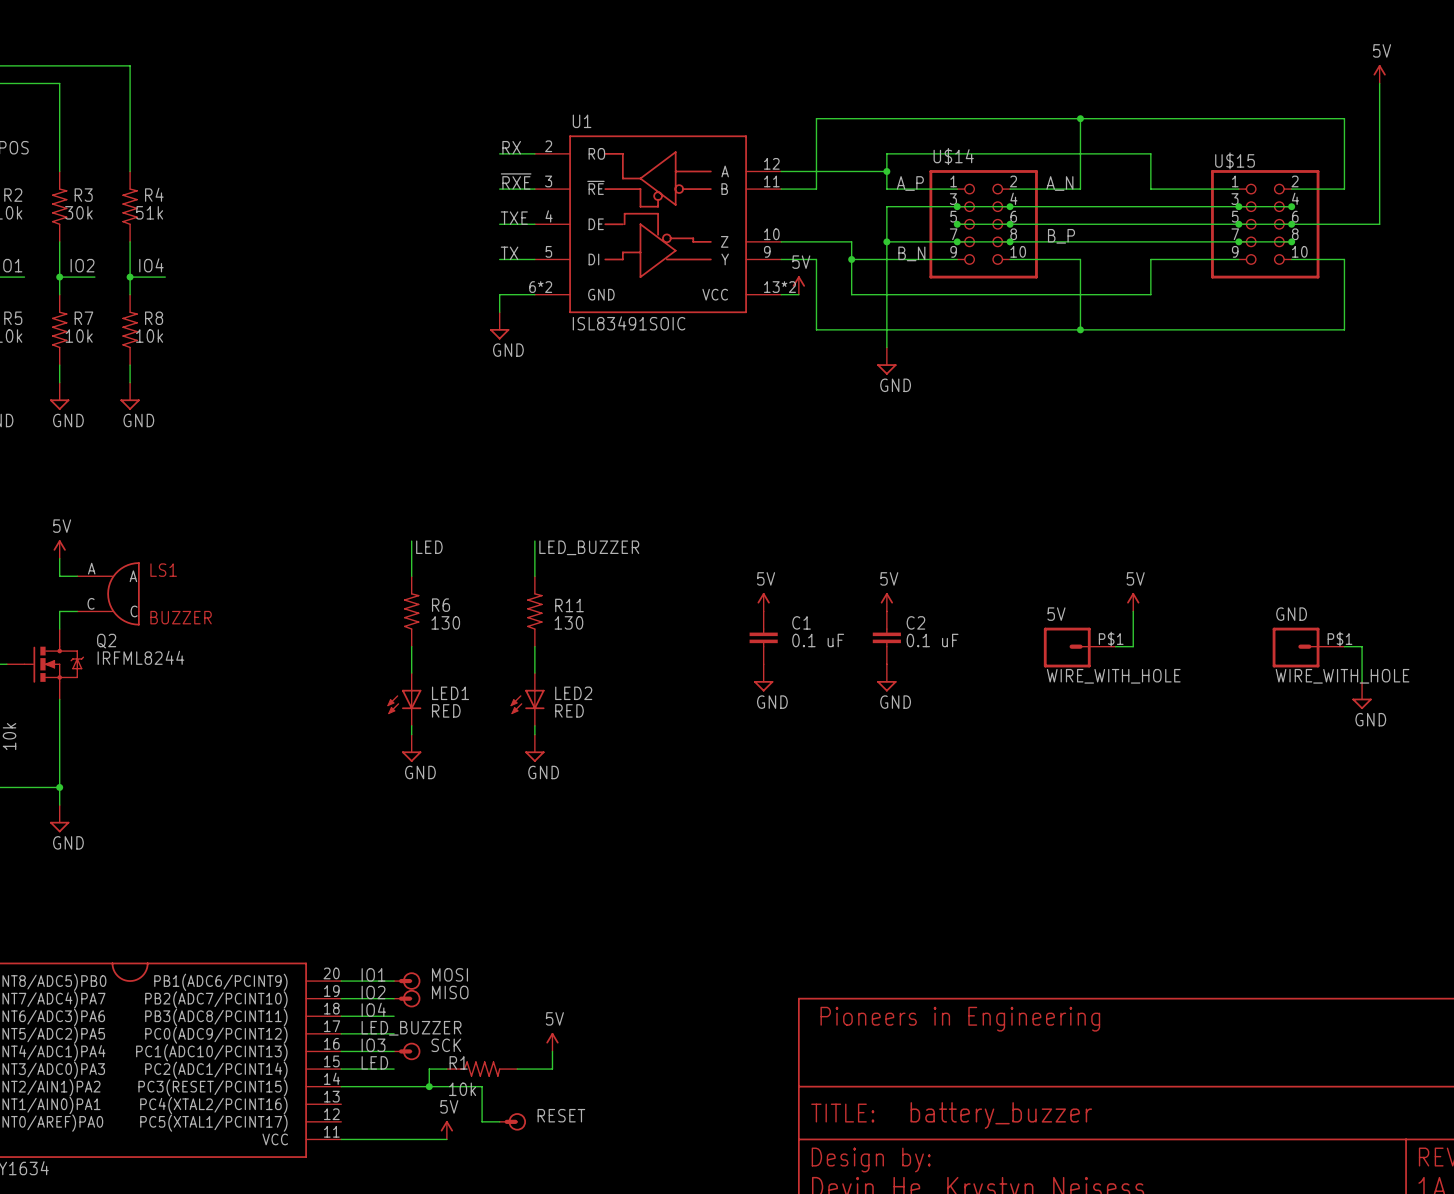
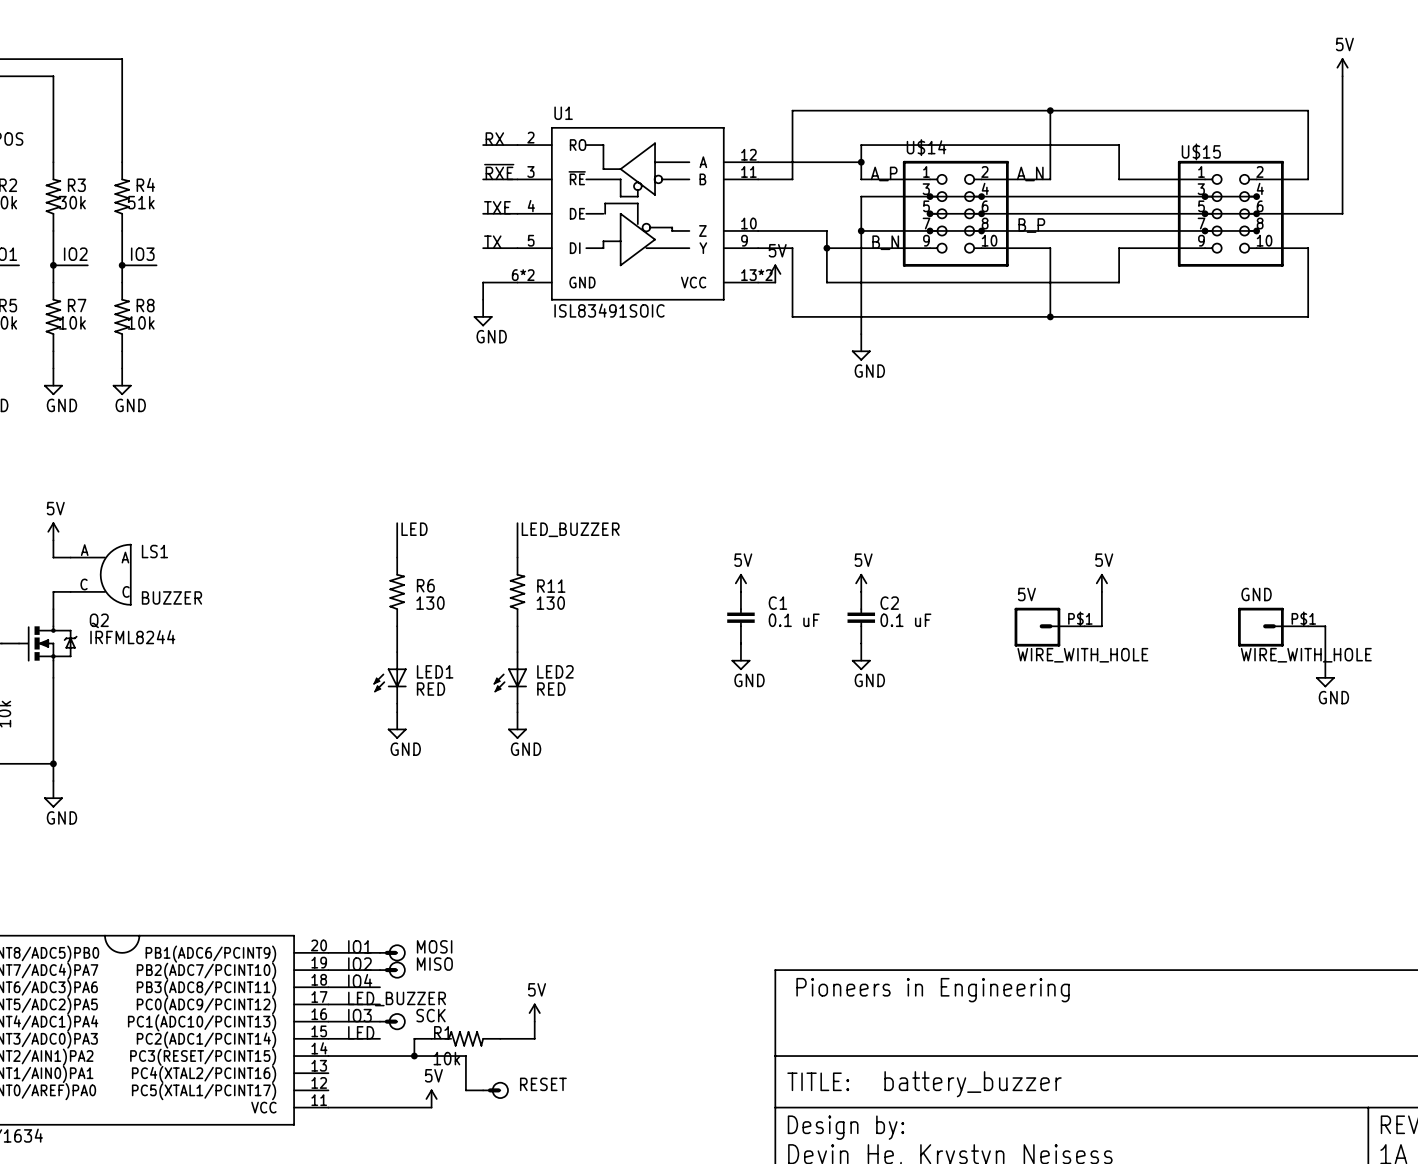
label: IO4 (151, 265) -> IO3 (142, 254)

